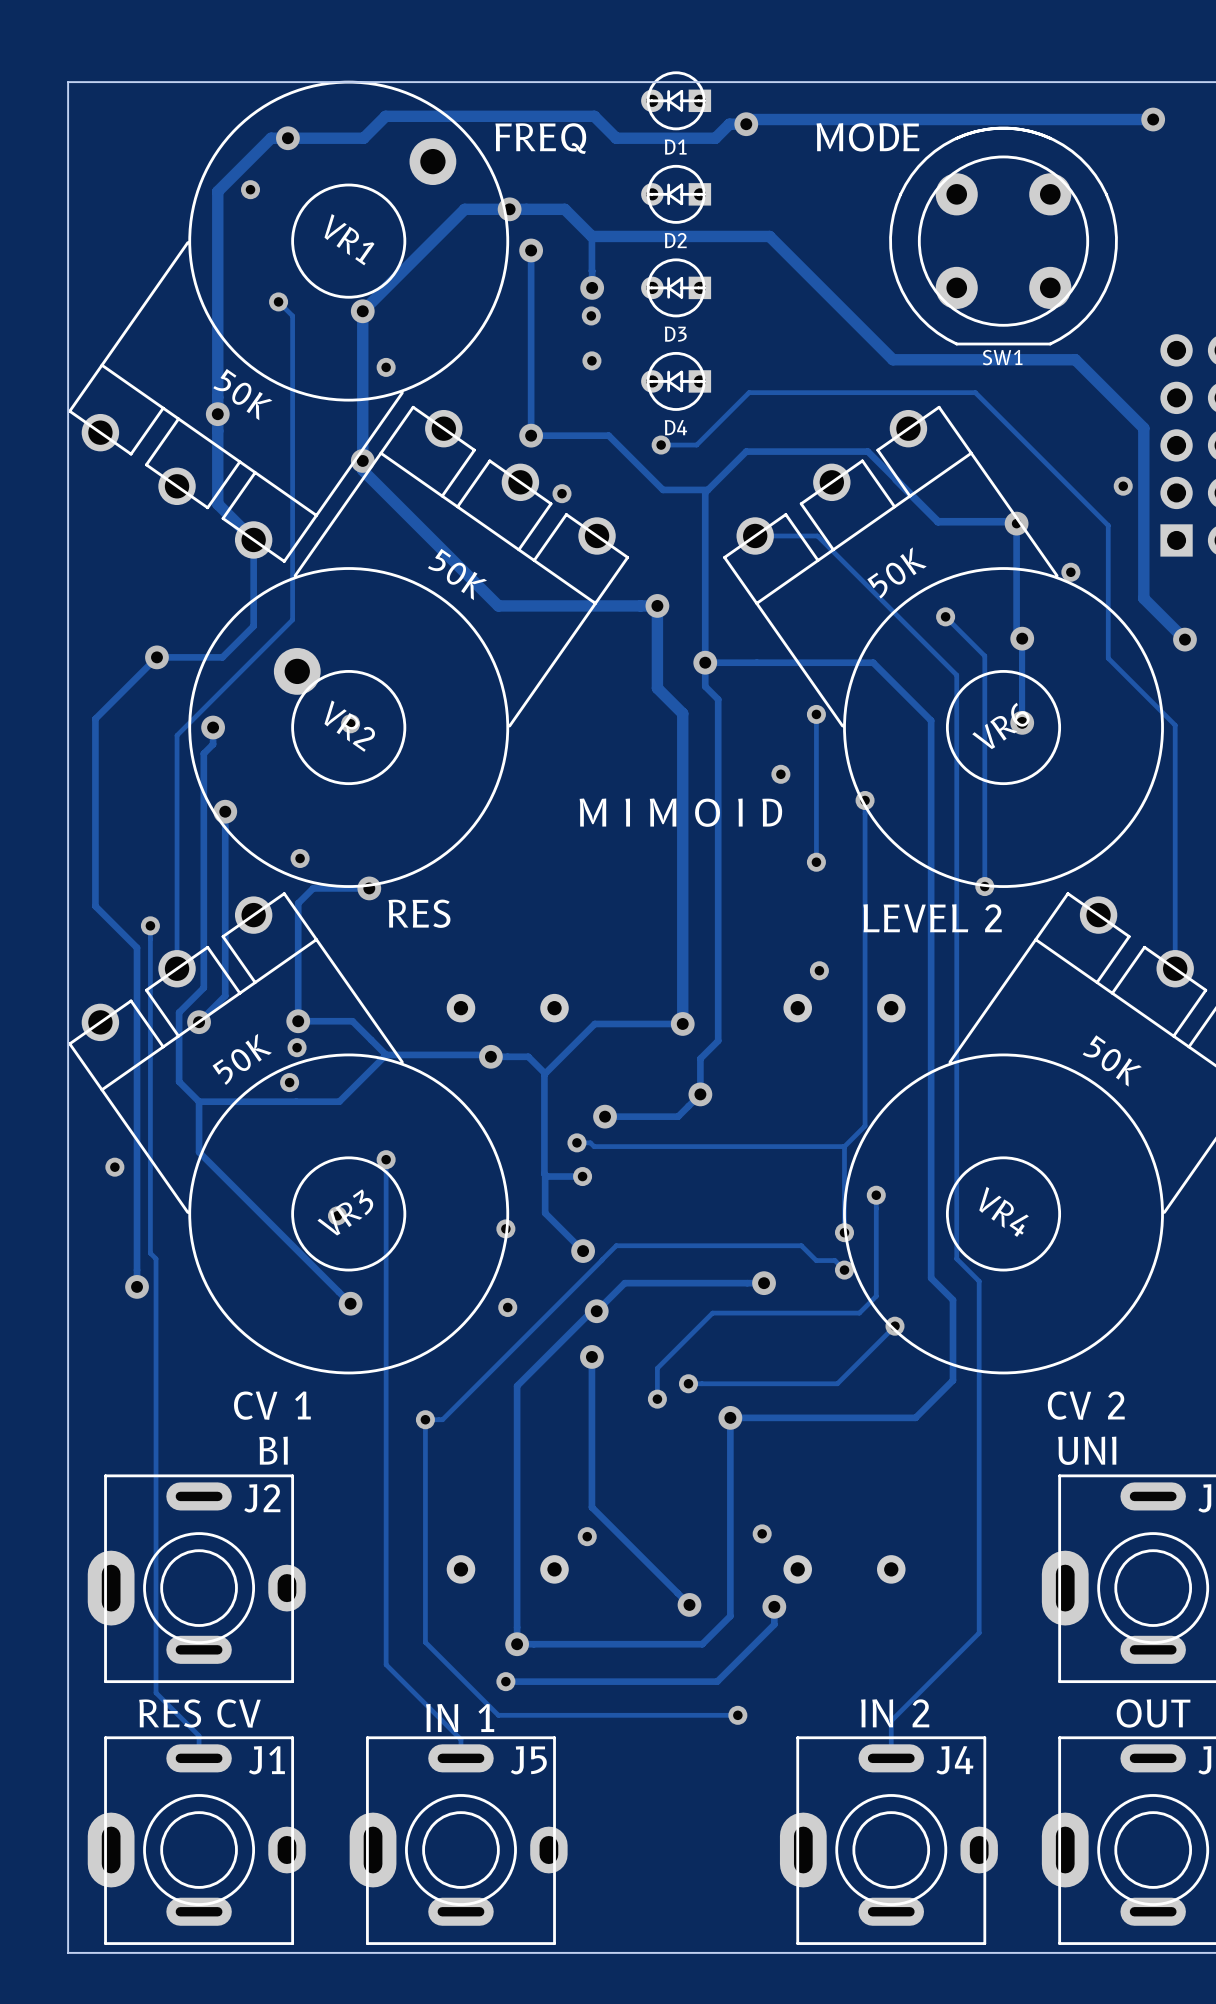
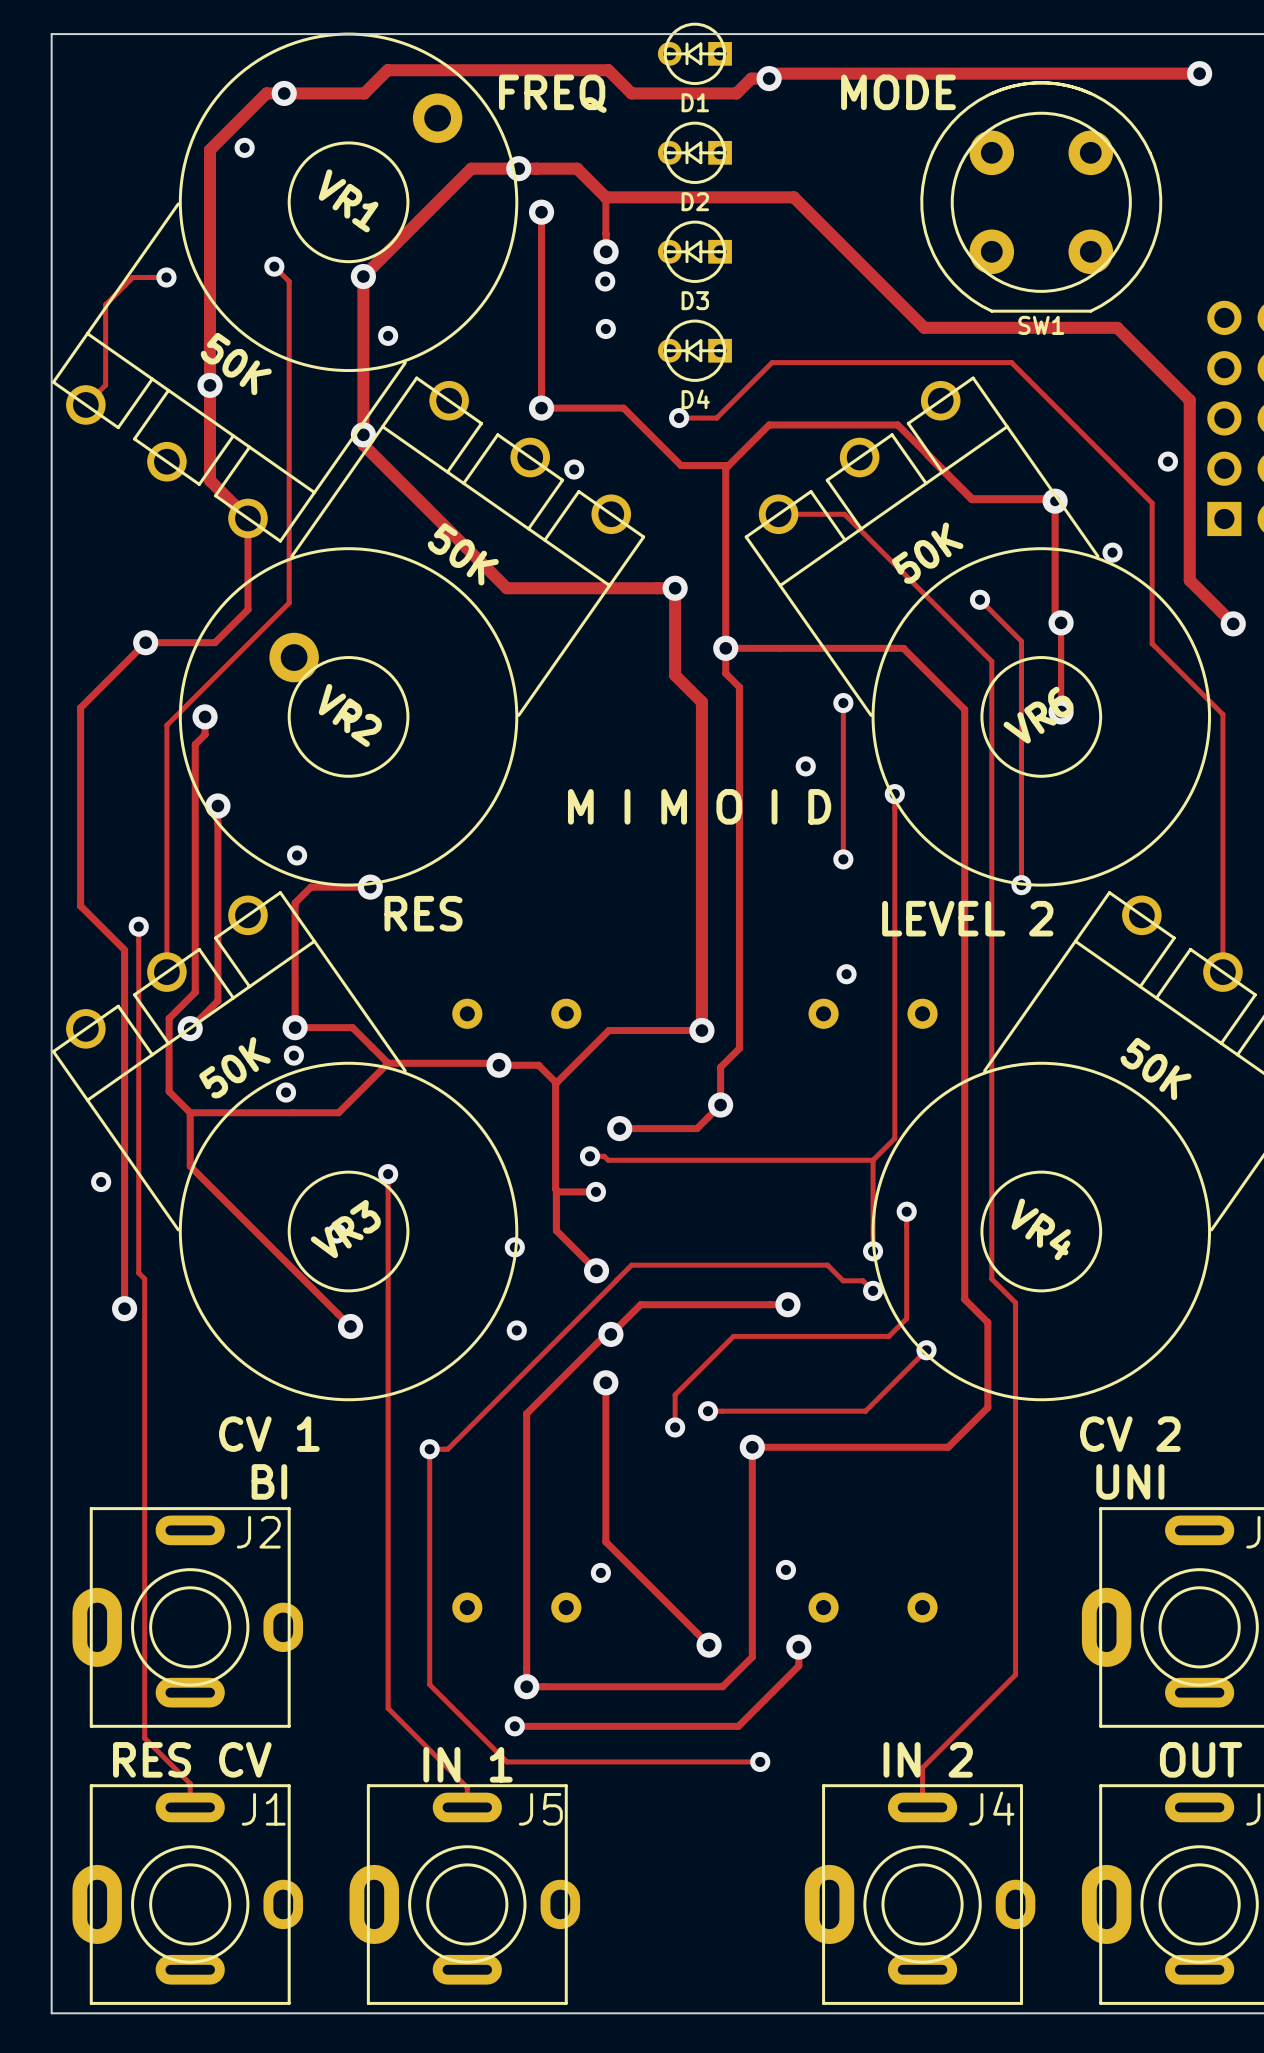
track: none -> (166, 277) (132, 277) (105, 304) (105, 385) (85, 404)
via: none -> (166, 277)

